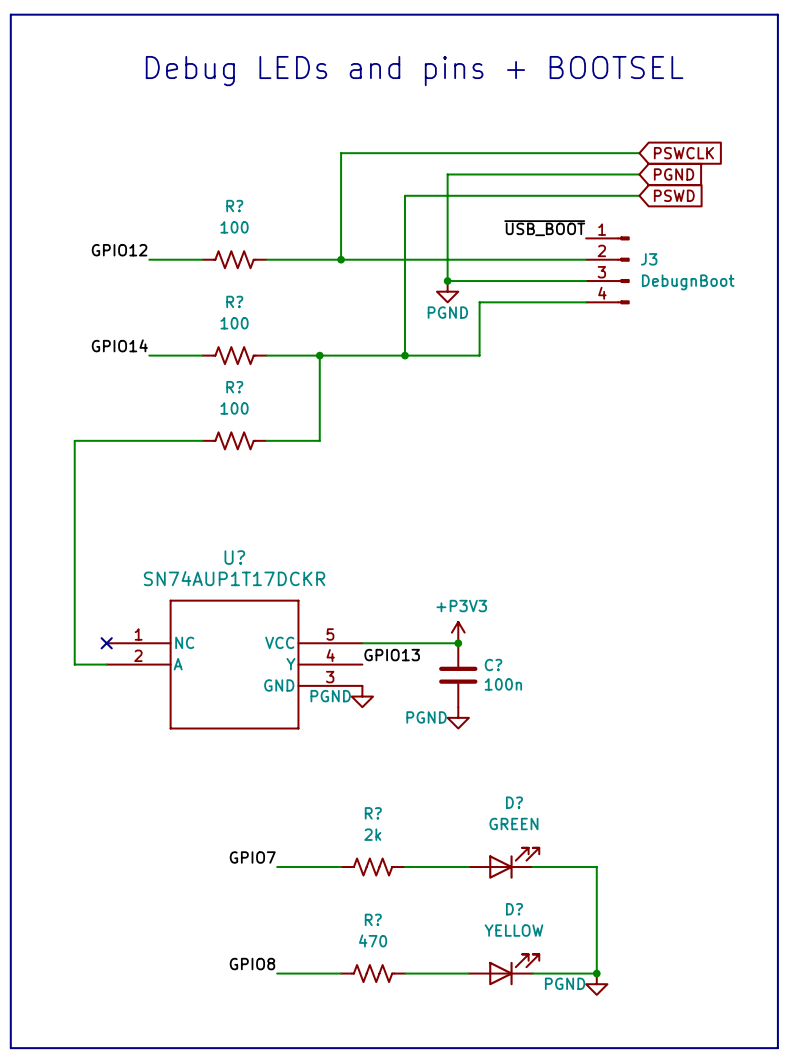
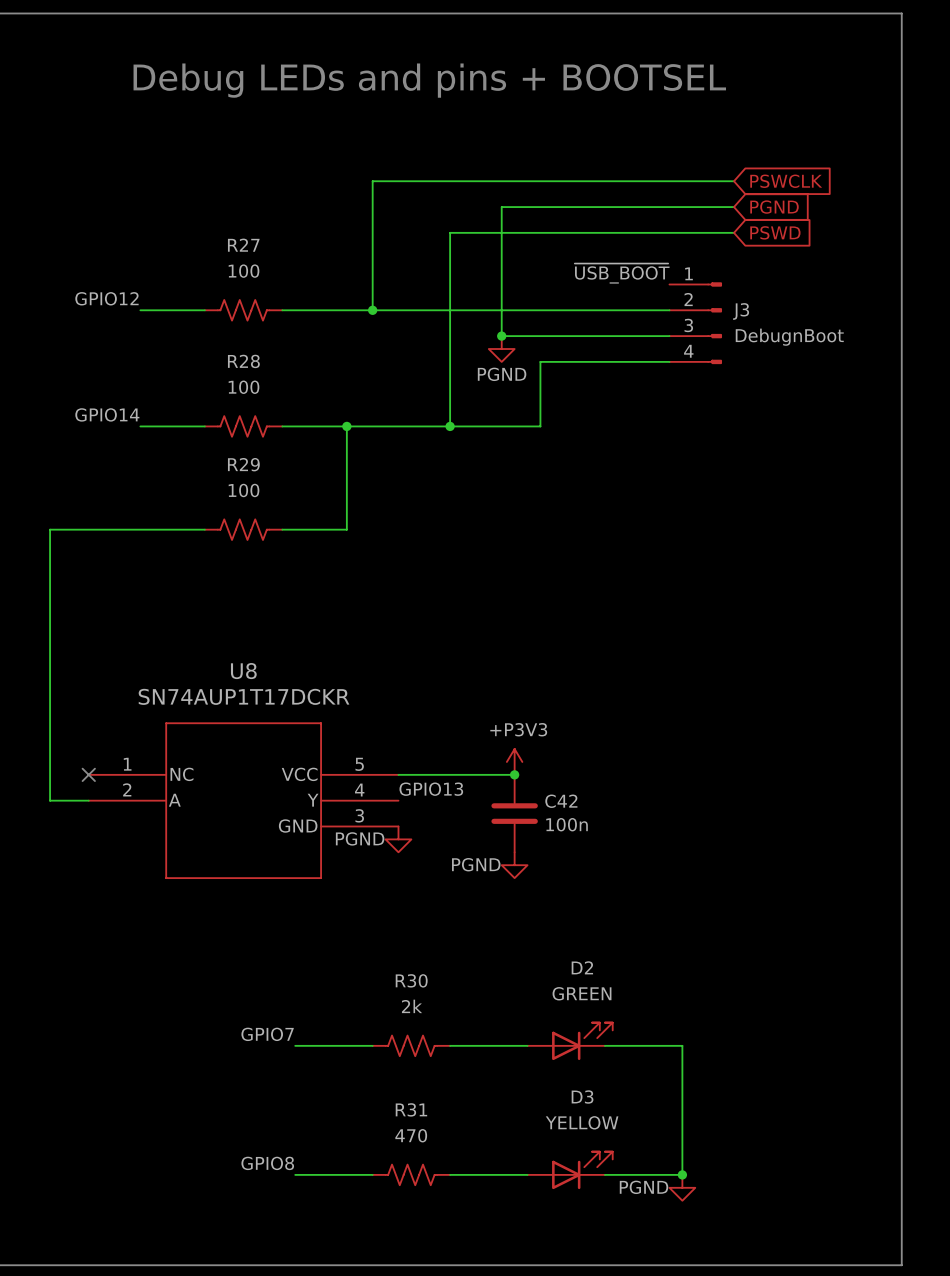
R? name: R? (234, 206) -> R27 (243, 245)
R? name: R? (234, 301) -> R28 (243, 361)
R? name: R? (234, 387) -> R29 (243, 464)
U? name: U? (234, 557) -> U8 (243, 671)
C? name: C? (493, 665) -> C42 (561, 801)
D? name: D? (514, 802) -> D2 (582, 967)
R? name: R? (373, 813) -> R30 (411, 980)
D? name: D? (514, 909) -> D3 (582, 1097)
R? name: R? (373, 919) -> R31 (411, 1109)

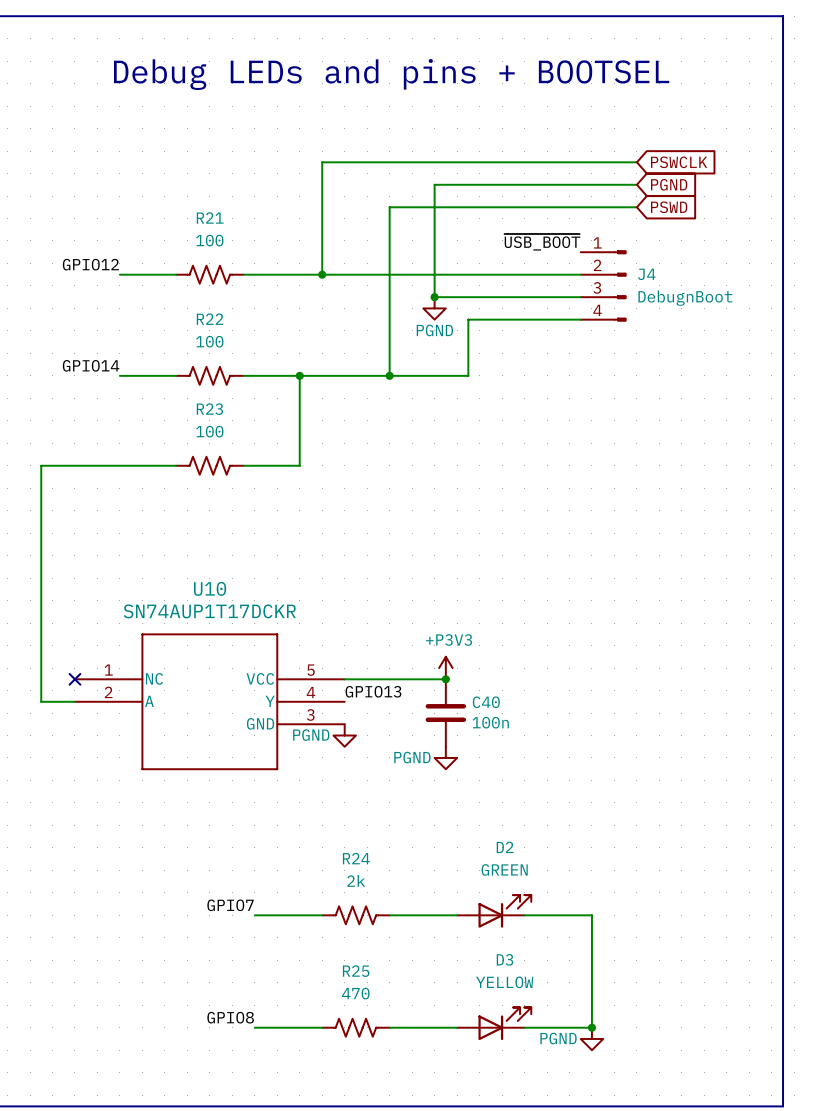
R27 name: R27 (243, 245) -> R21 (210, 217)
J3 name: J3 (741, 311) -> J4 (646, 274)
R28 name: R28 (243, 361) -> R22 (210, 319)
R29 name: R29 (243, 464) -> R23 (209, 409)
U8 name: U8 (243, 671) -> U10 (210, 588)
C42 name: C42 (561, 801) -> C40 (486, 702)
R30 name: R30 (411, 980) -> R24 (356, 858)
R31 name: R31 (411, 1109) -> R25 (356, 971)

